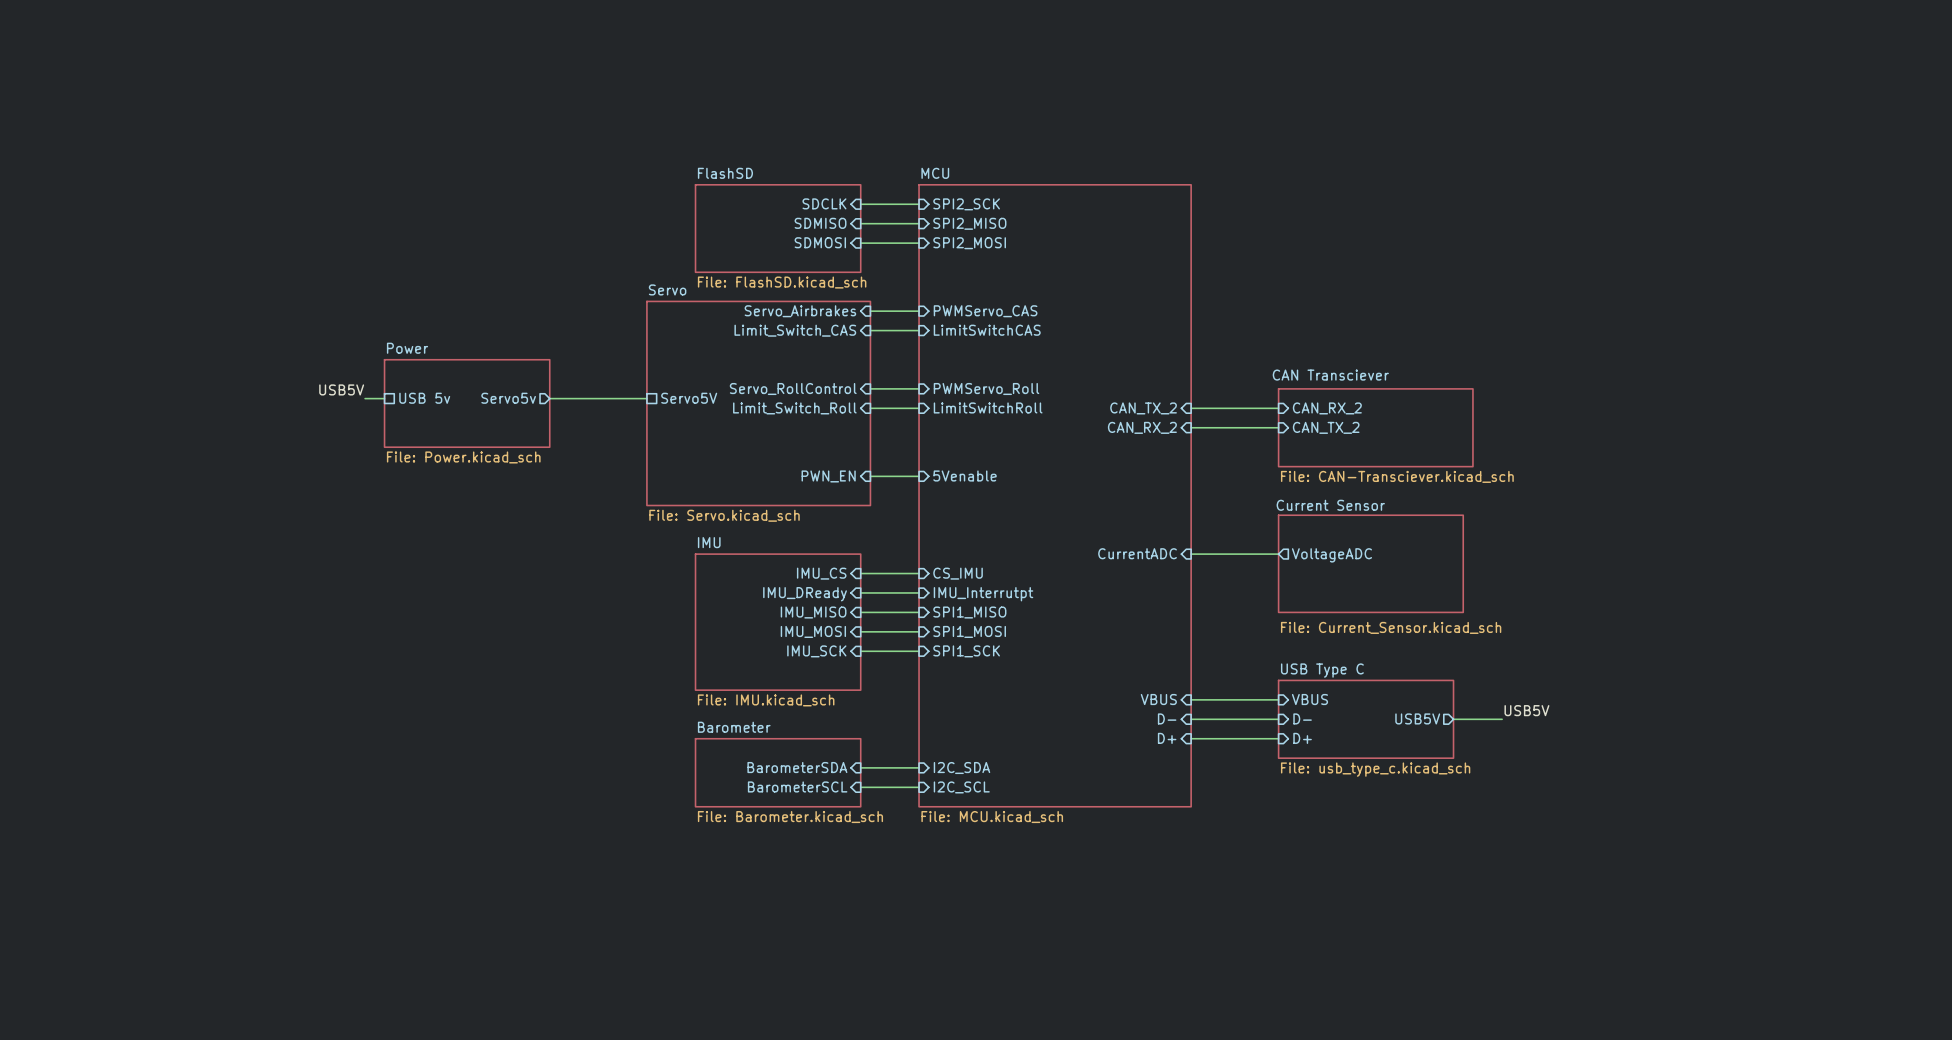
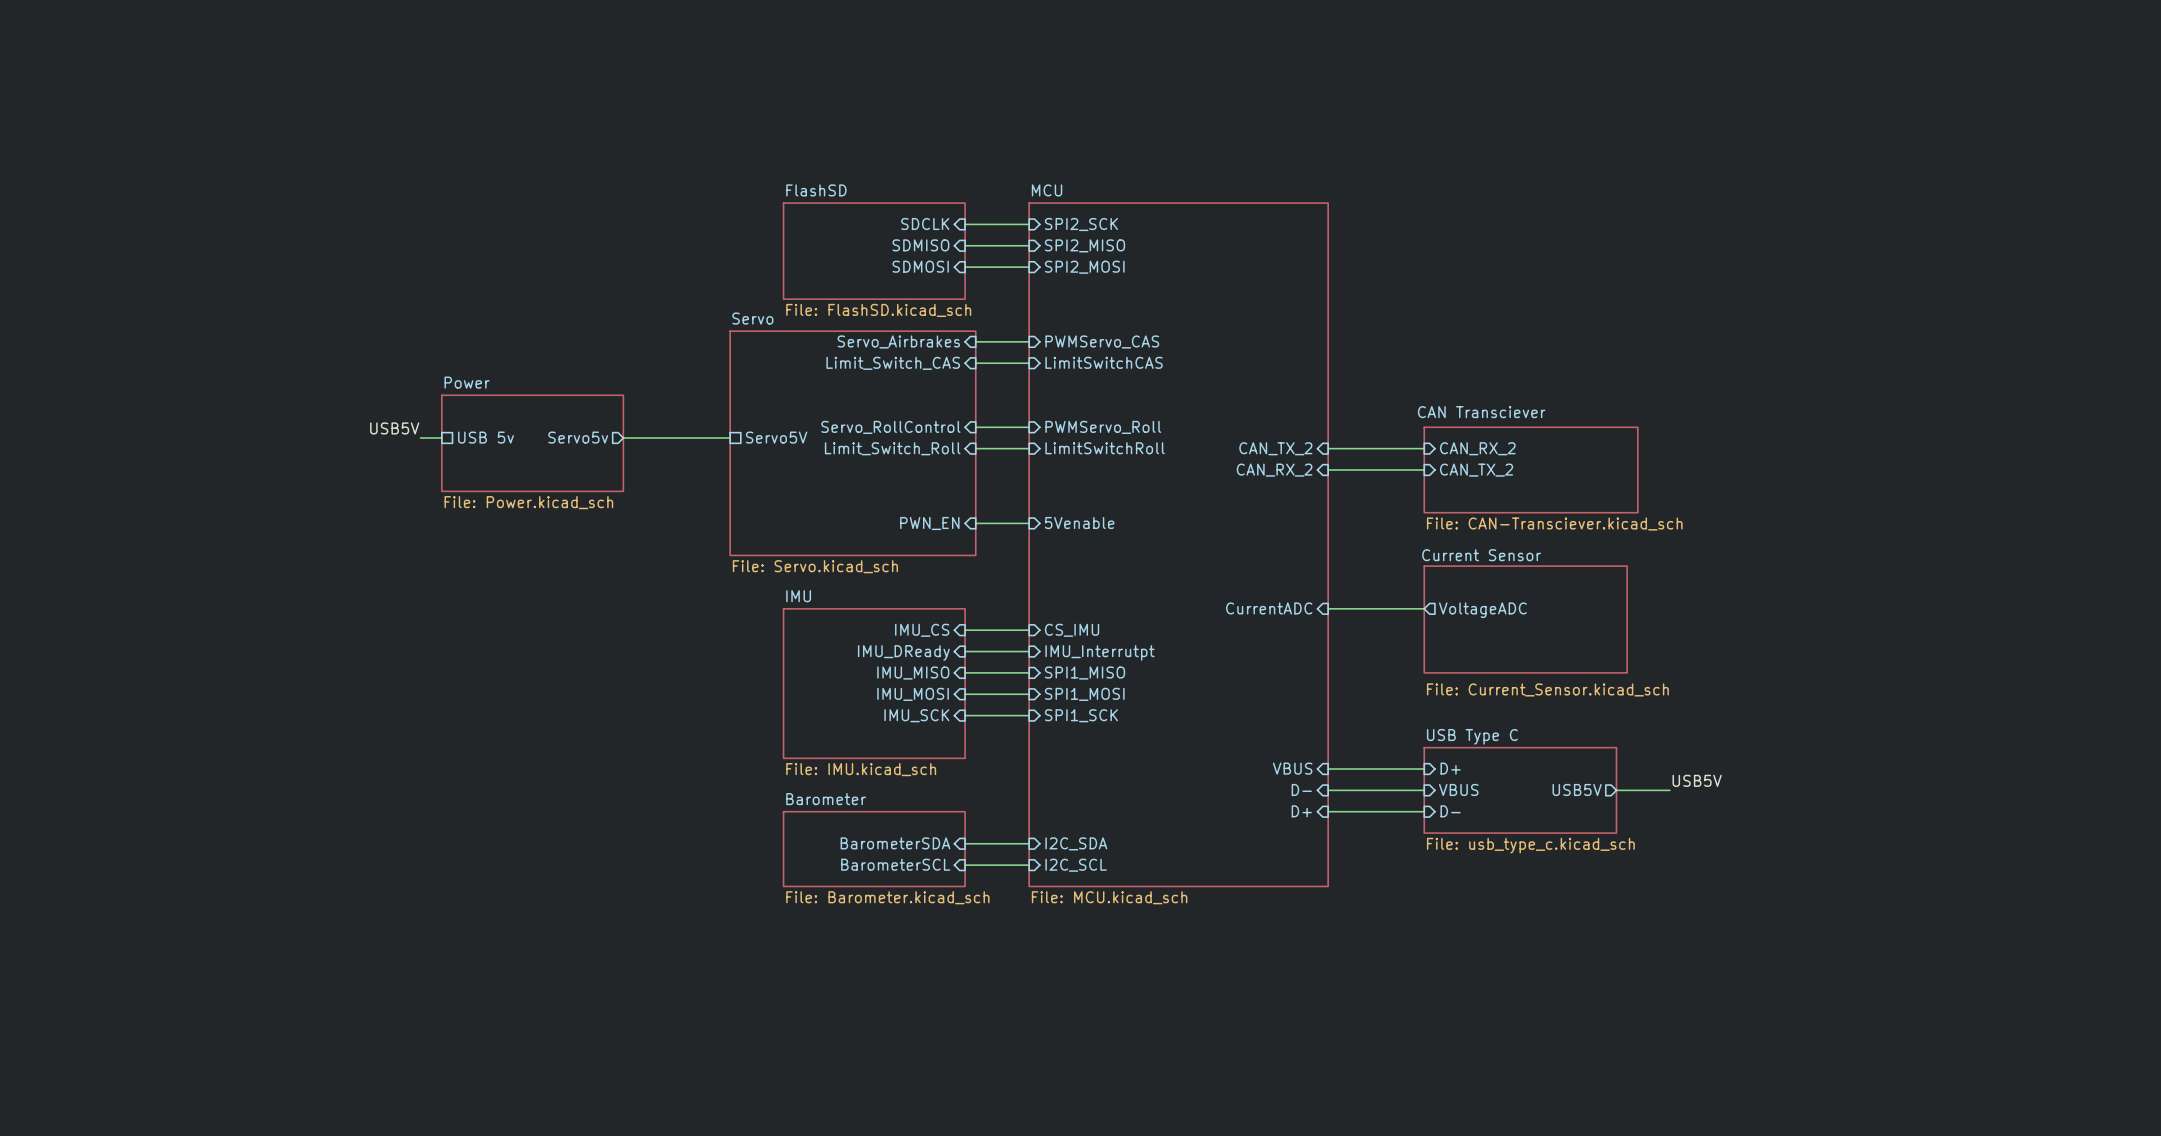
sheet pin: VBUS (1309, 699) -> D+ (1450, 768)
sheet pin: D- (1302, 718) -> VBUS (1458, 789)
sheet pin: D+ (1302, 738) -> D- (1450, 811)

